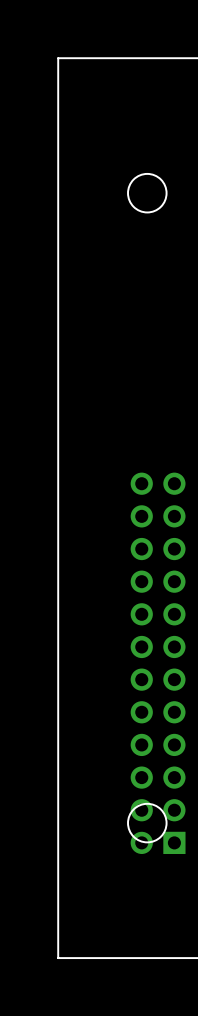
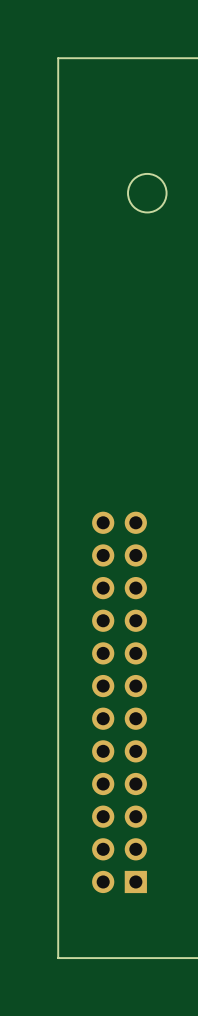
part position: (158, 663) -> (119, 702)
round board edge: [127, 802, 168, 844] -> none

